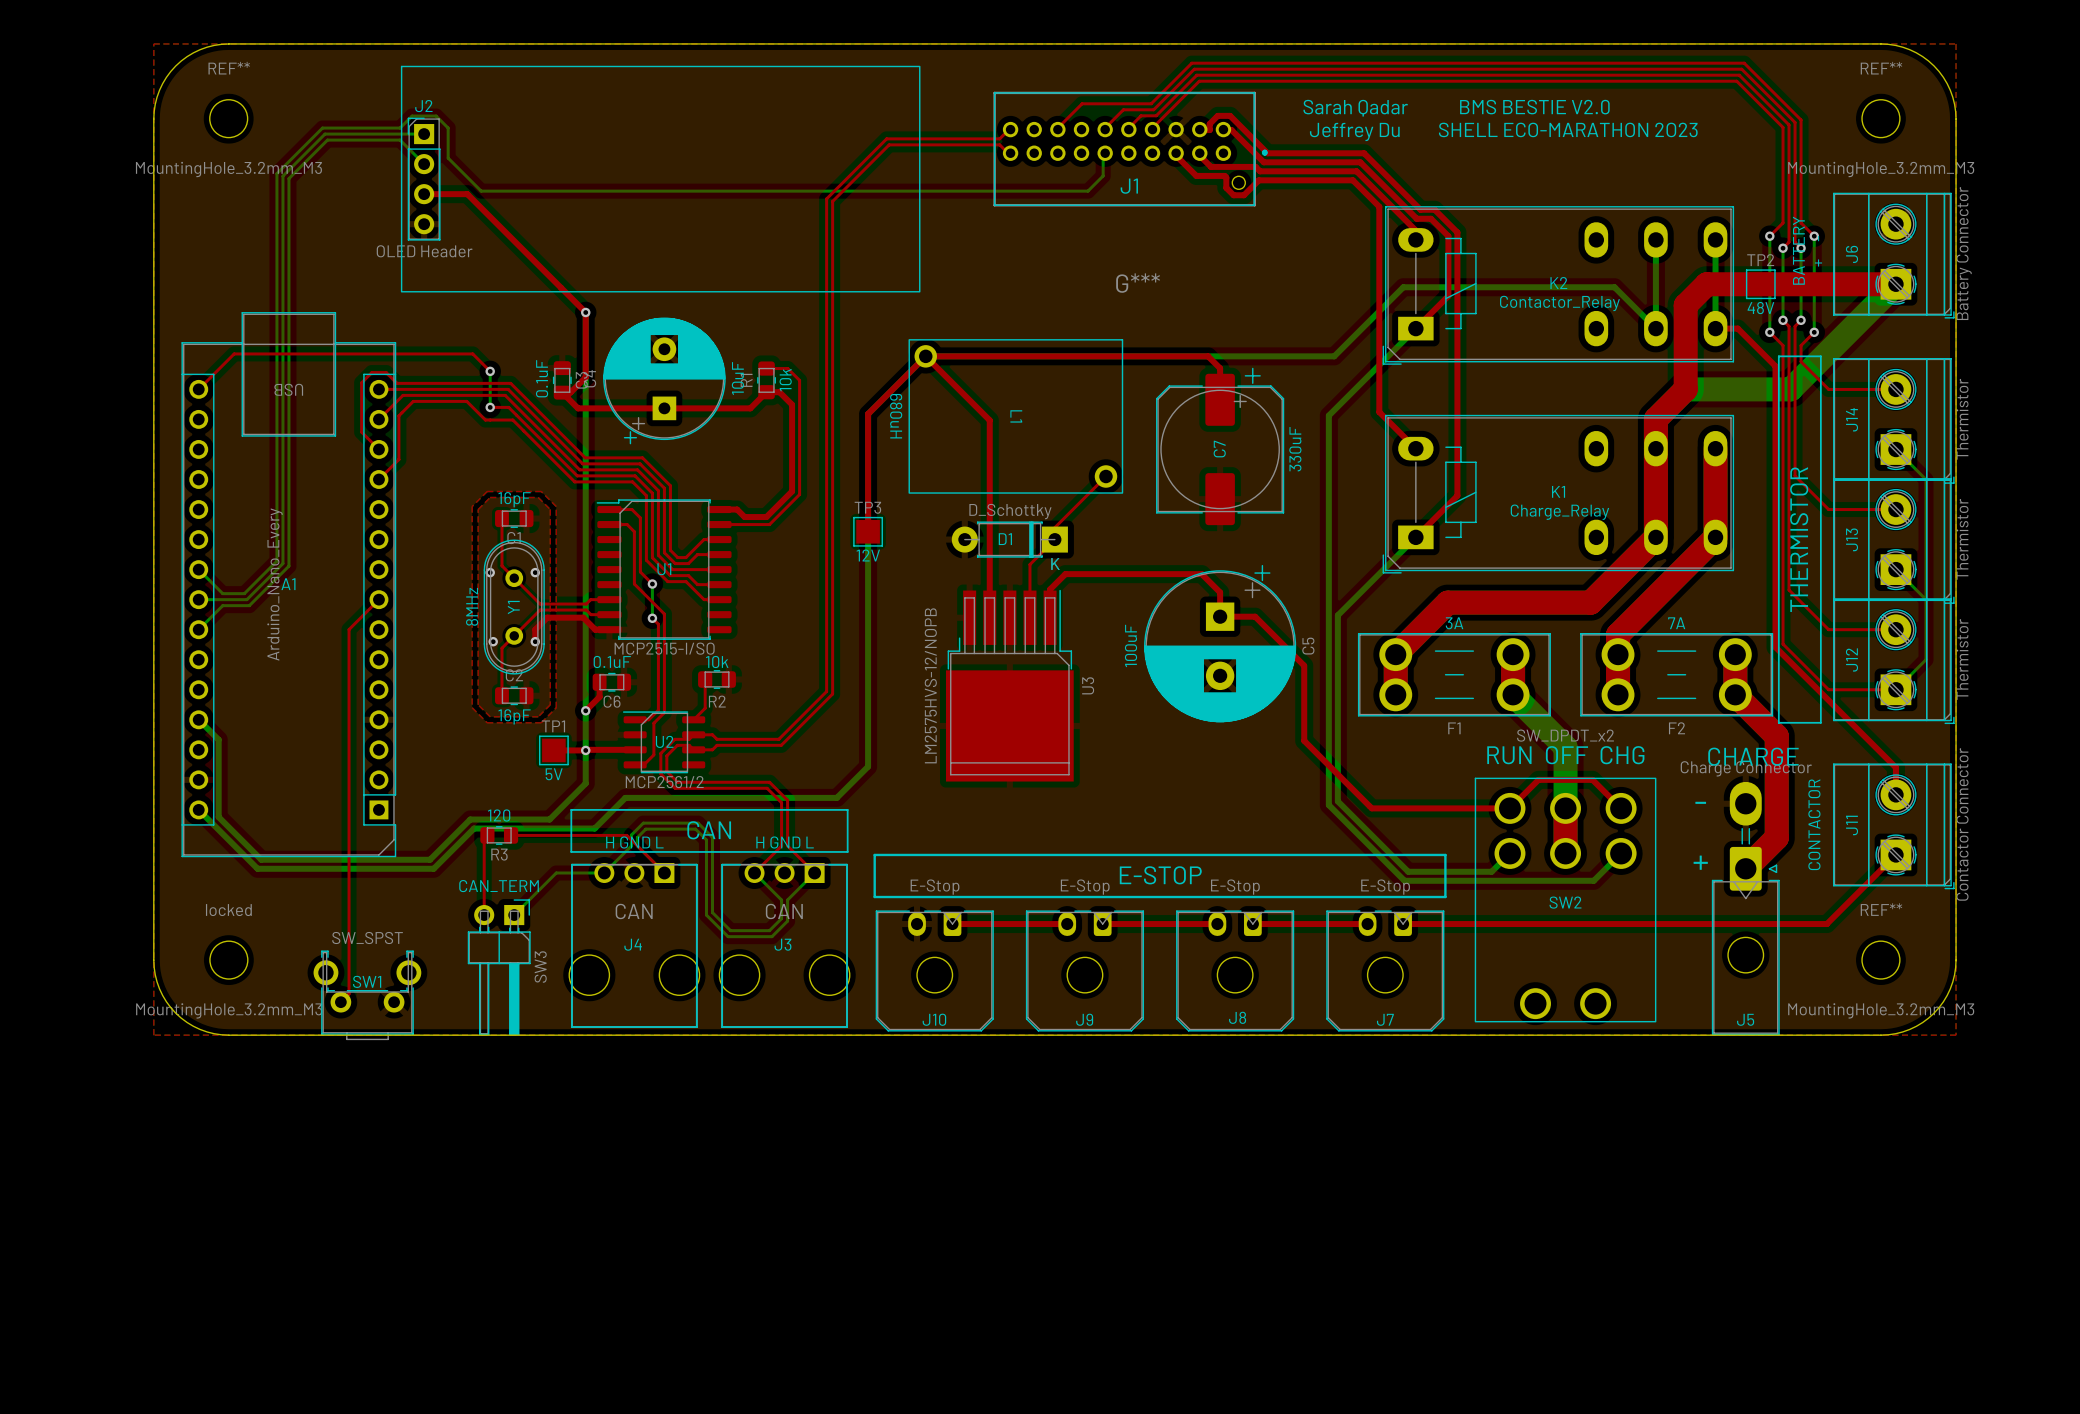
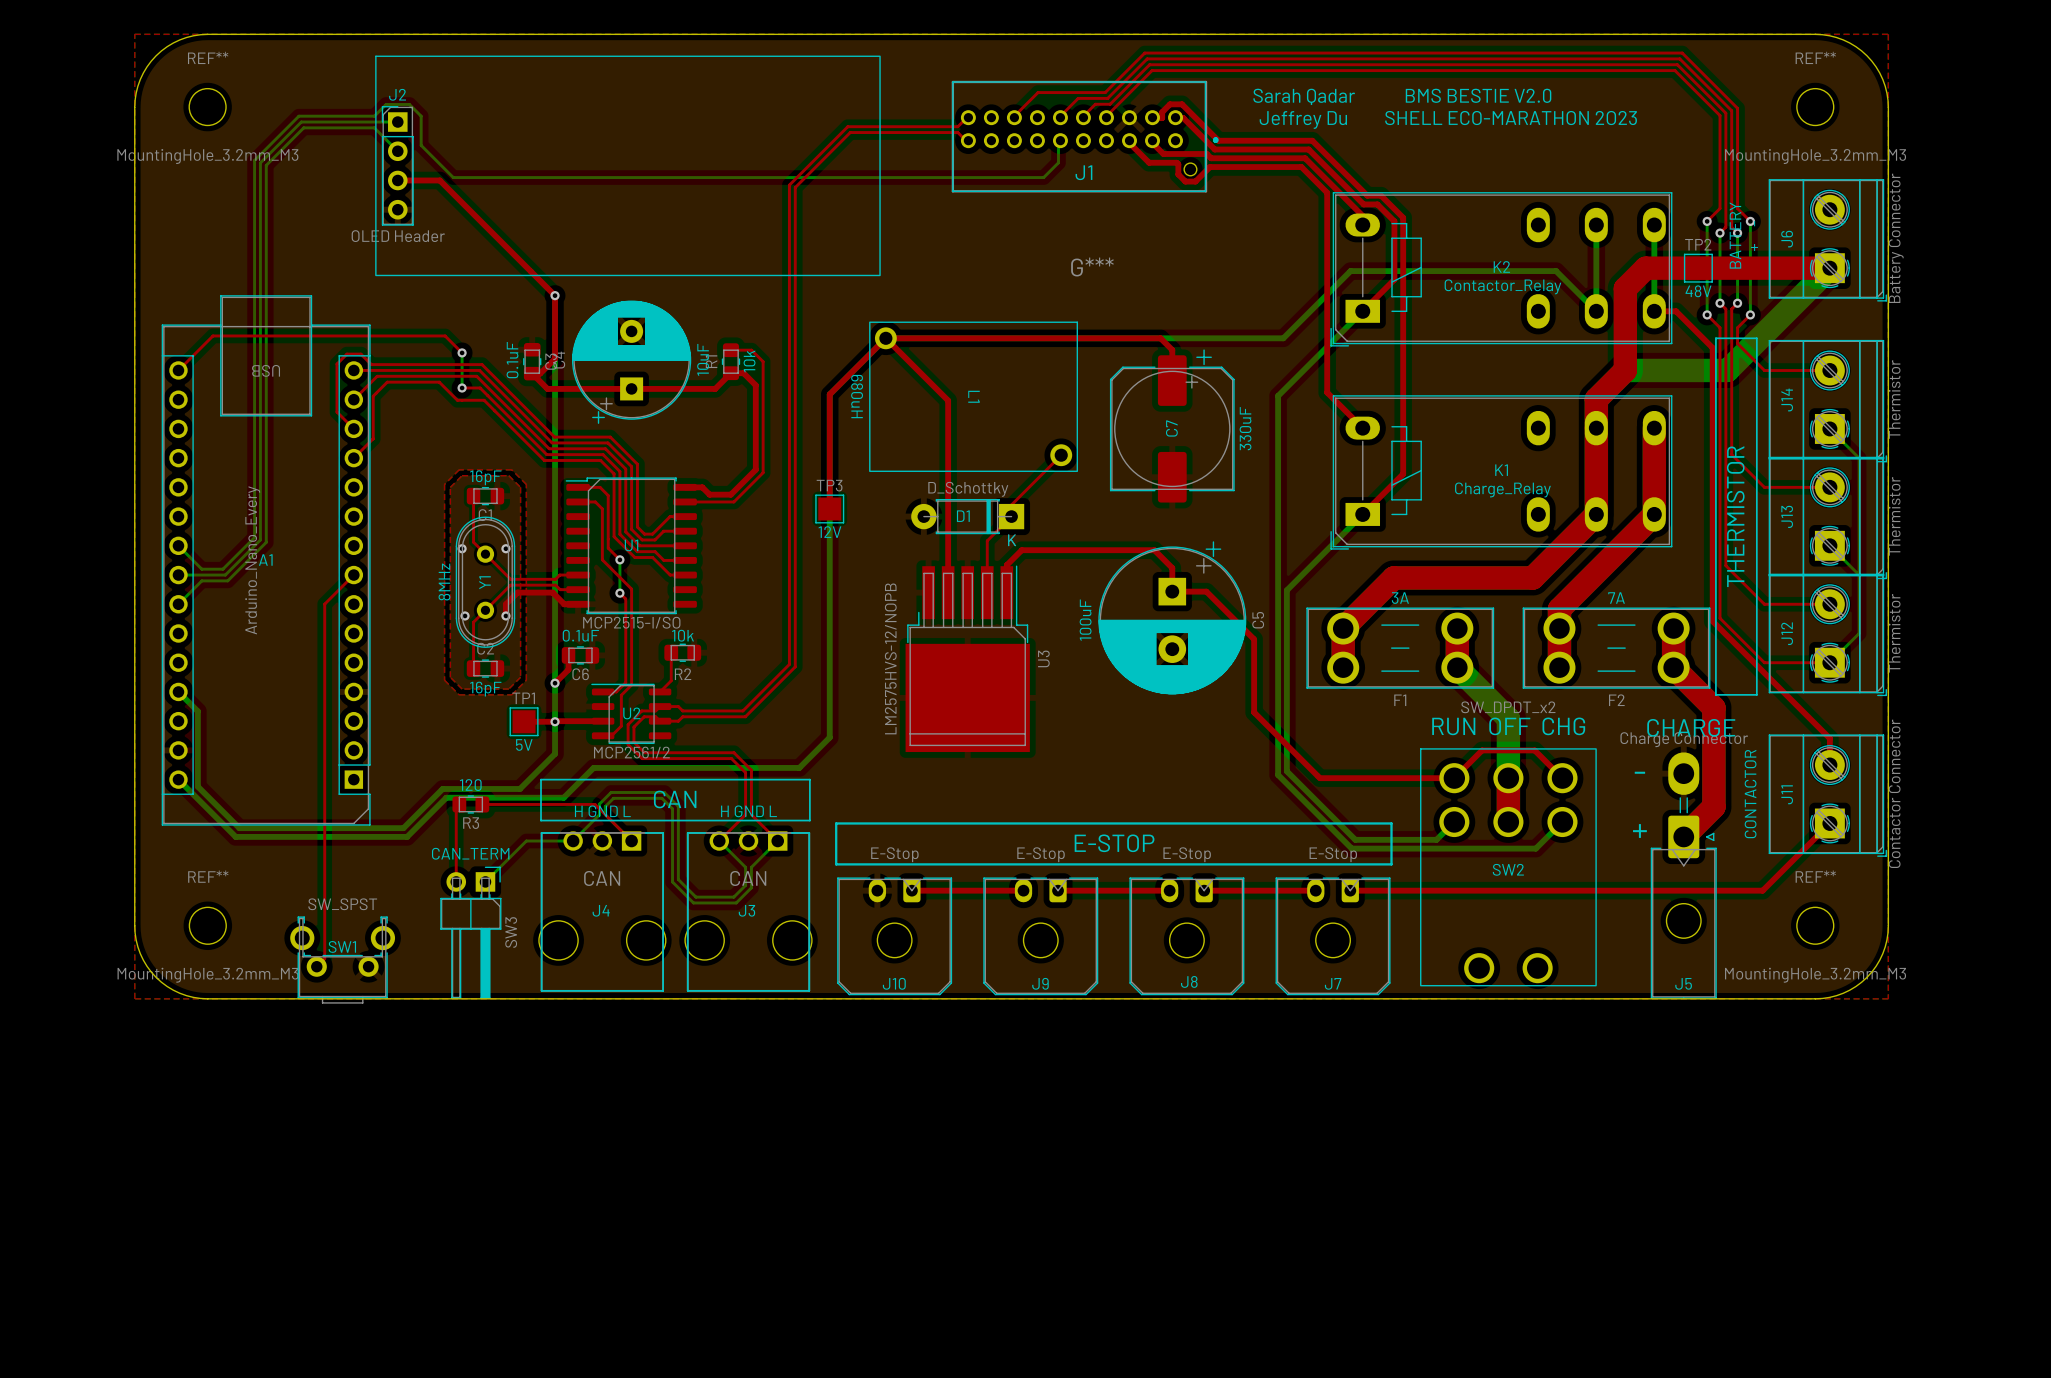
locked name: locked (228, 910) -> REF** (208, 876)

